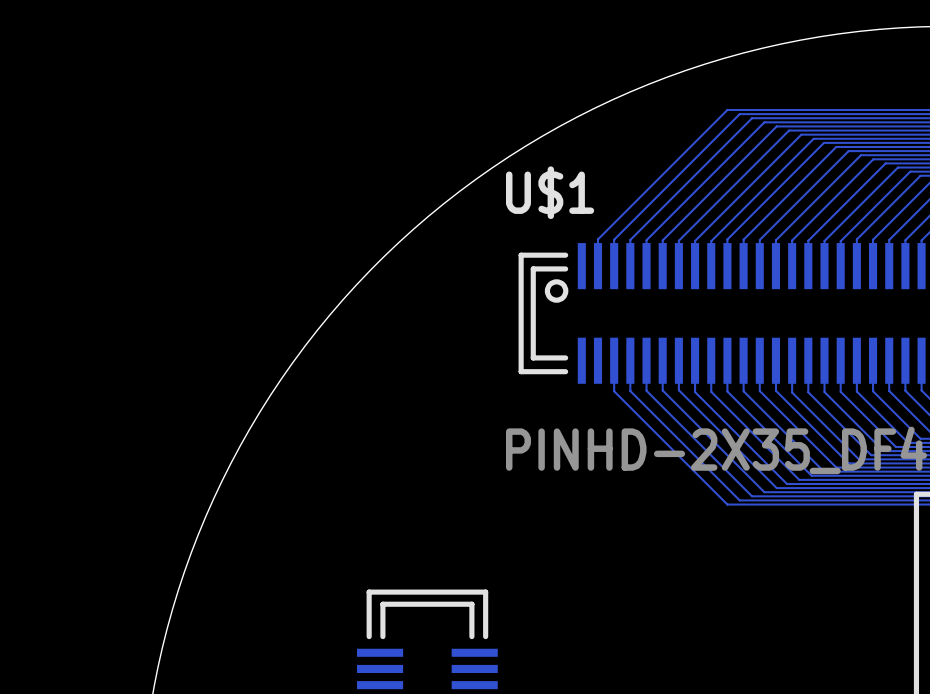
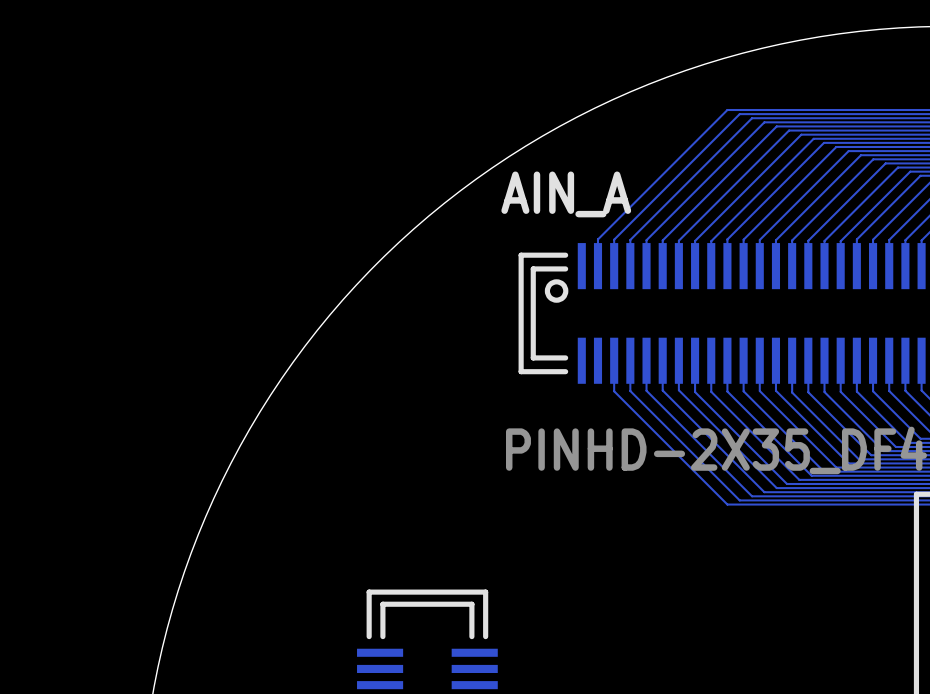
U$1 name: U$1 (550, 192) -> AIN_A (566, 194)

